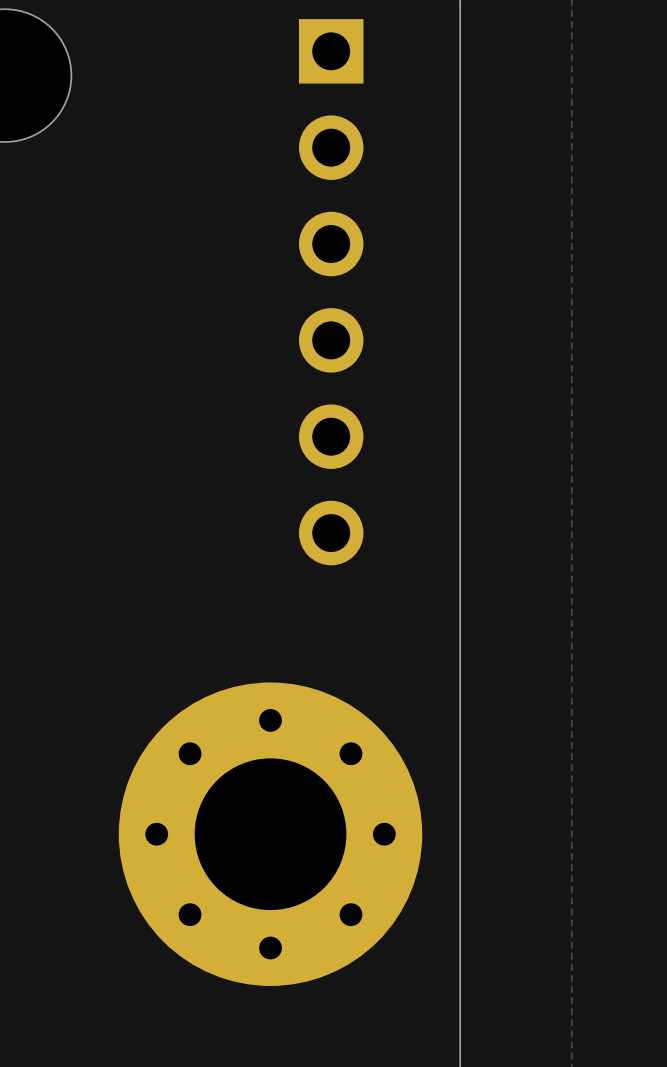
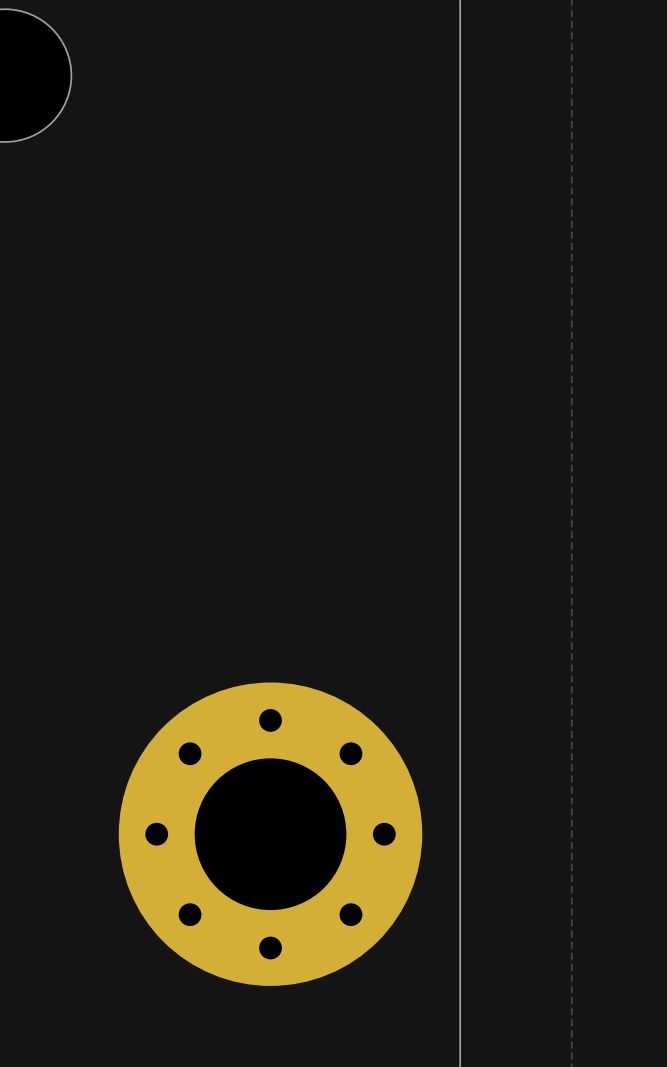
part: (331, 292) -> none

